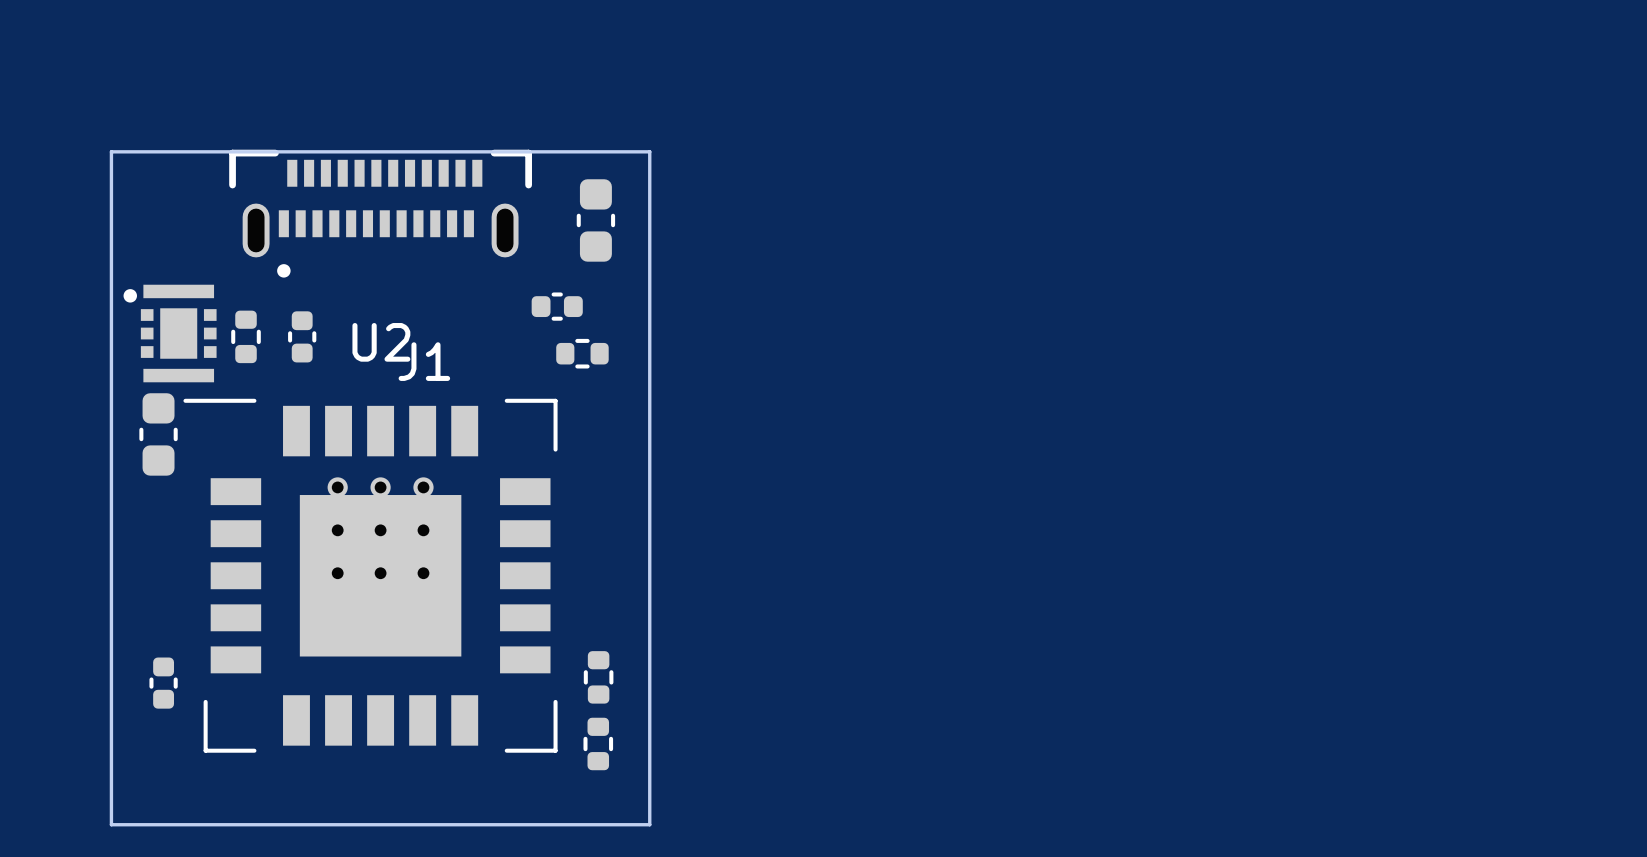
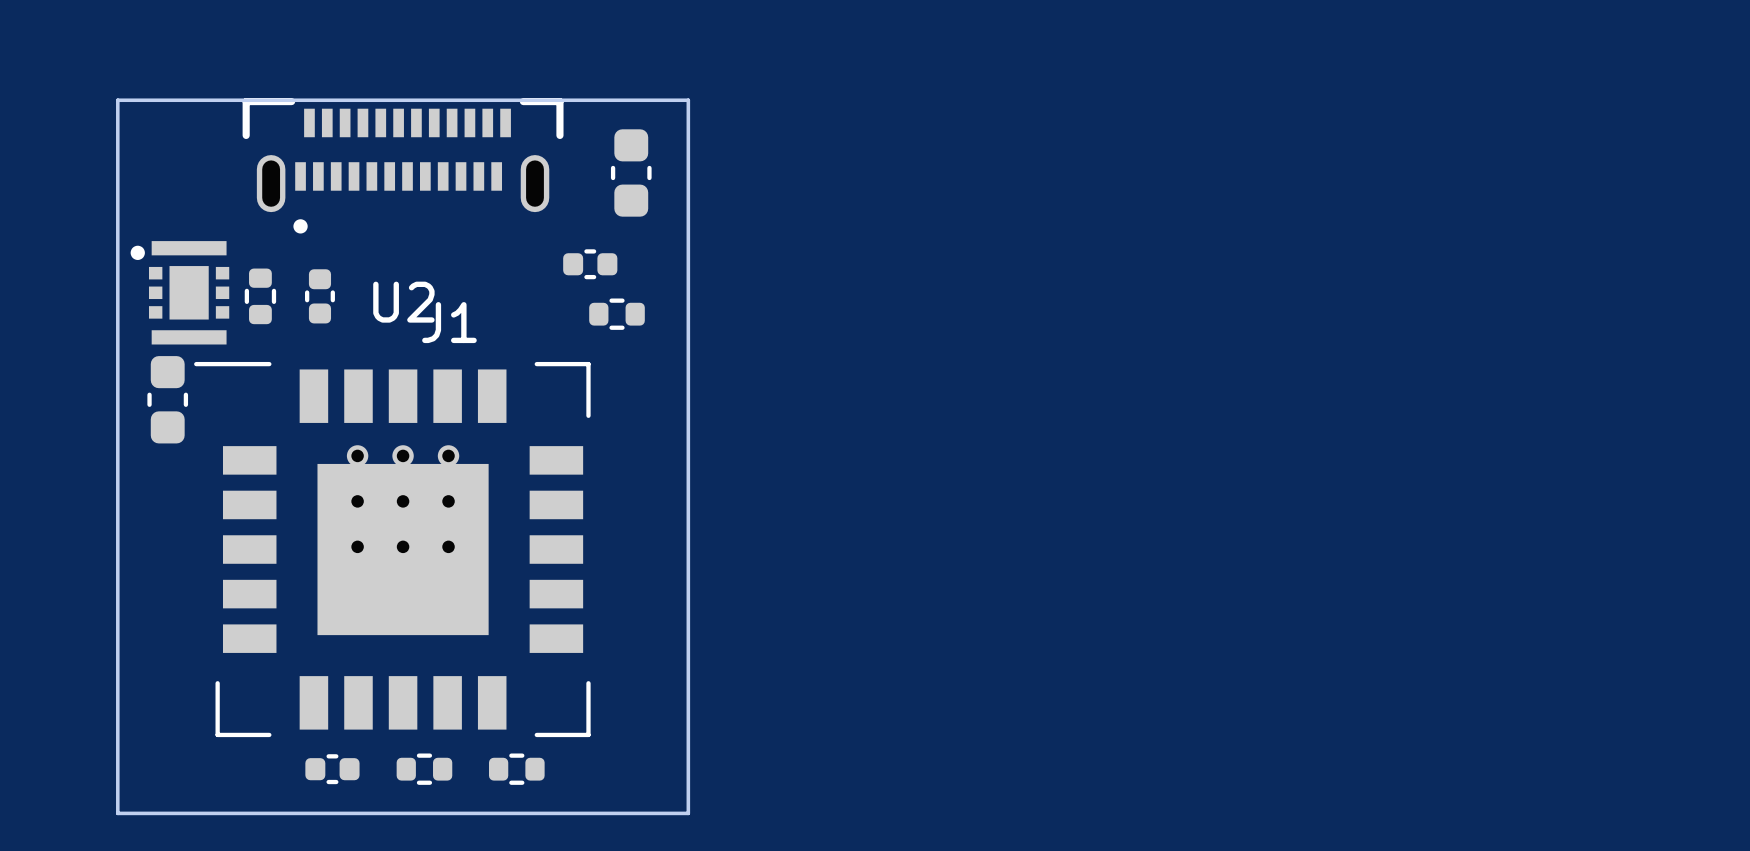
part: (598, 677) -> none
part rotation: 0° (163, 683) -> 90° clockwise (332, 769)
part position: (163, 683) -> (332, 769)
part: (598, 743) -> none
part: none -> (424, 769)
part: none -> (516, 769)

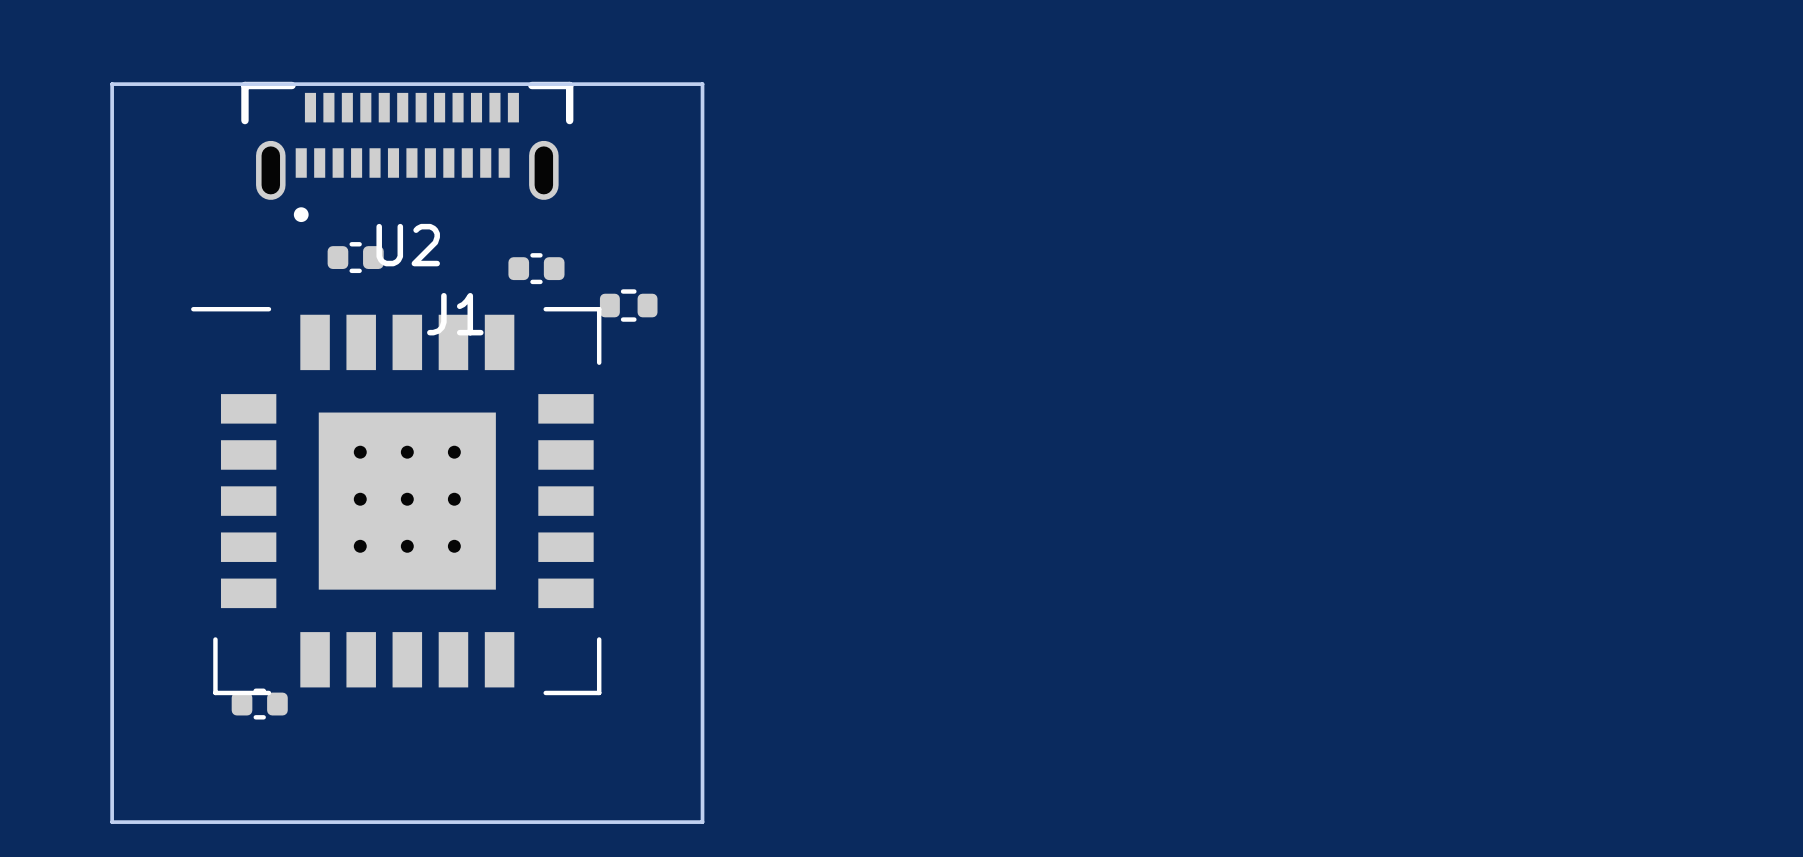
part: (631, 172) -> none
part position: (590, 264) -> (536, 268)
part: (179, 292) -> none
part: (260, 296) -> none
part rotation: 0° (319, 296) -> 90° clockwise (355, 257)
part position: (319, 296) -> (355, 257)
part: (167, 399) -> none
U2 position: (392, 549) -> (396, 501)
part position: (332, 769) -> (259, 704)
part: (424, 769) -> none
part: (516, 769) -> none

